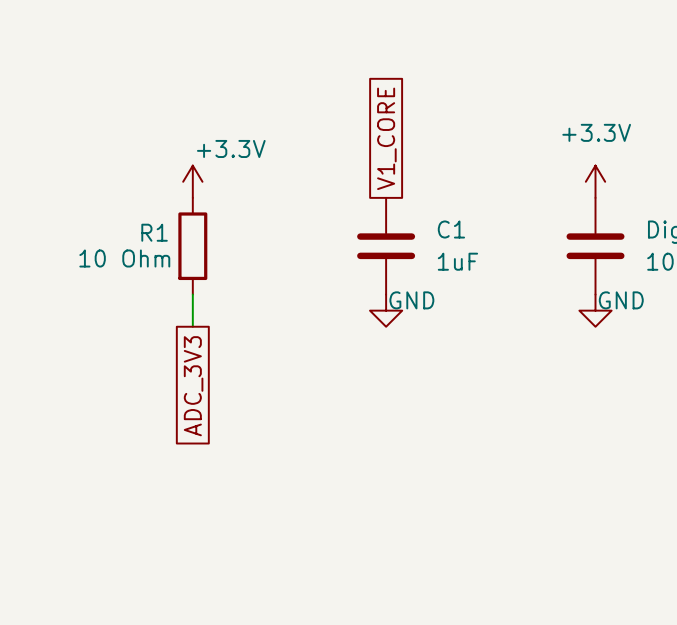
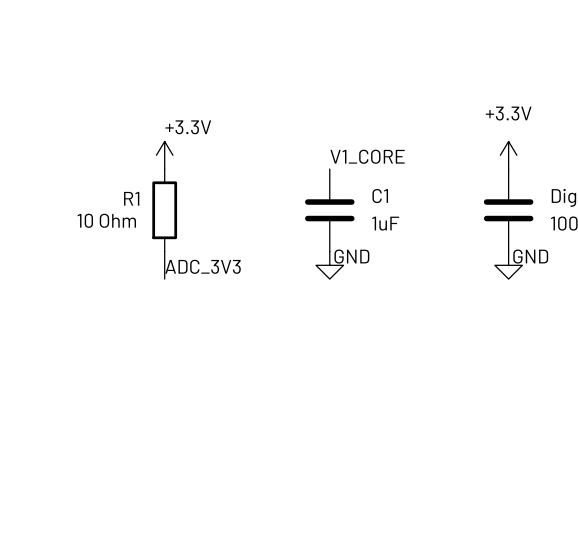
global label: V1_CORE (386, 138) -> none
label: none -> V1_CORE (367, 156)
label: none -> ADC_3V3 (203, 266)
global label: ADC_3V3 (193, 386) -> none

